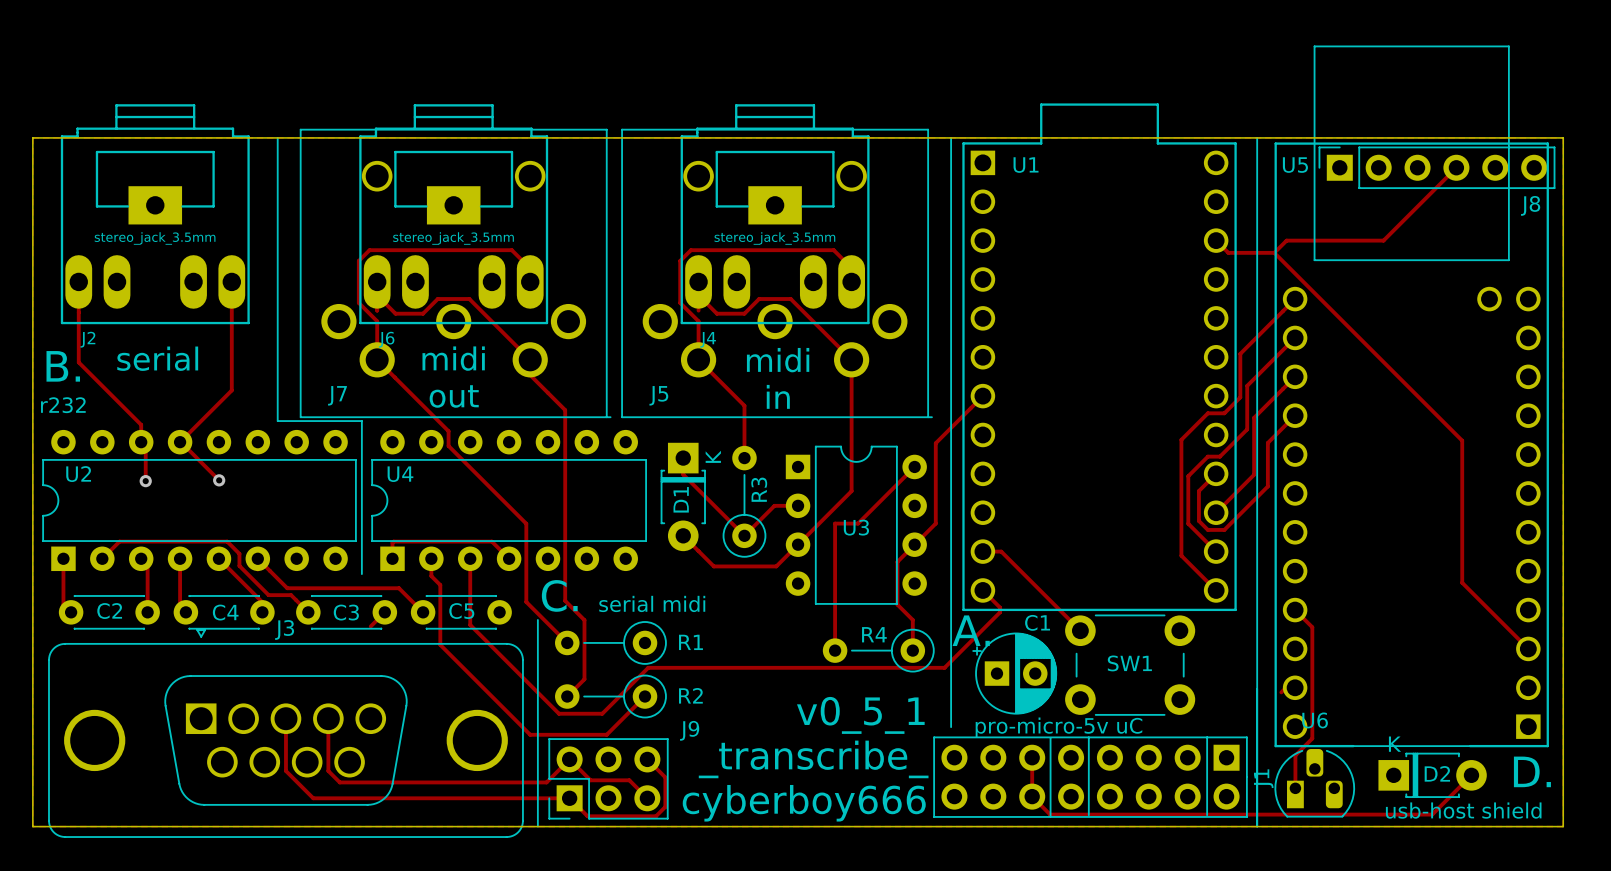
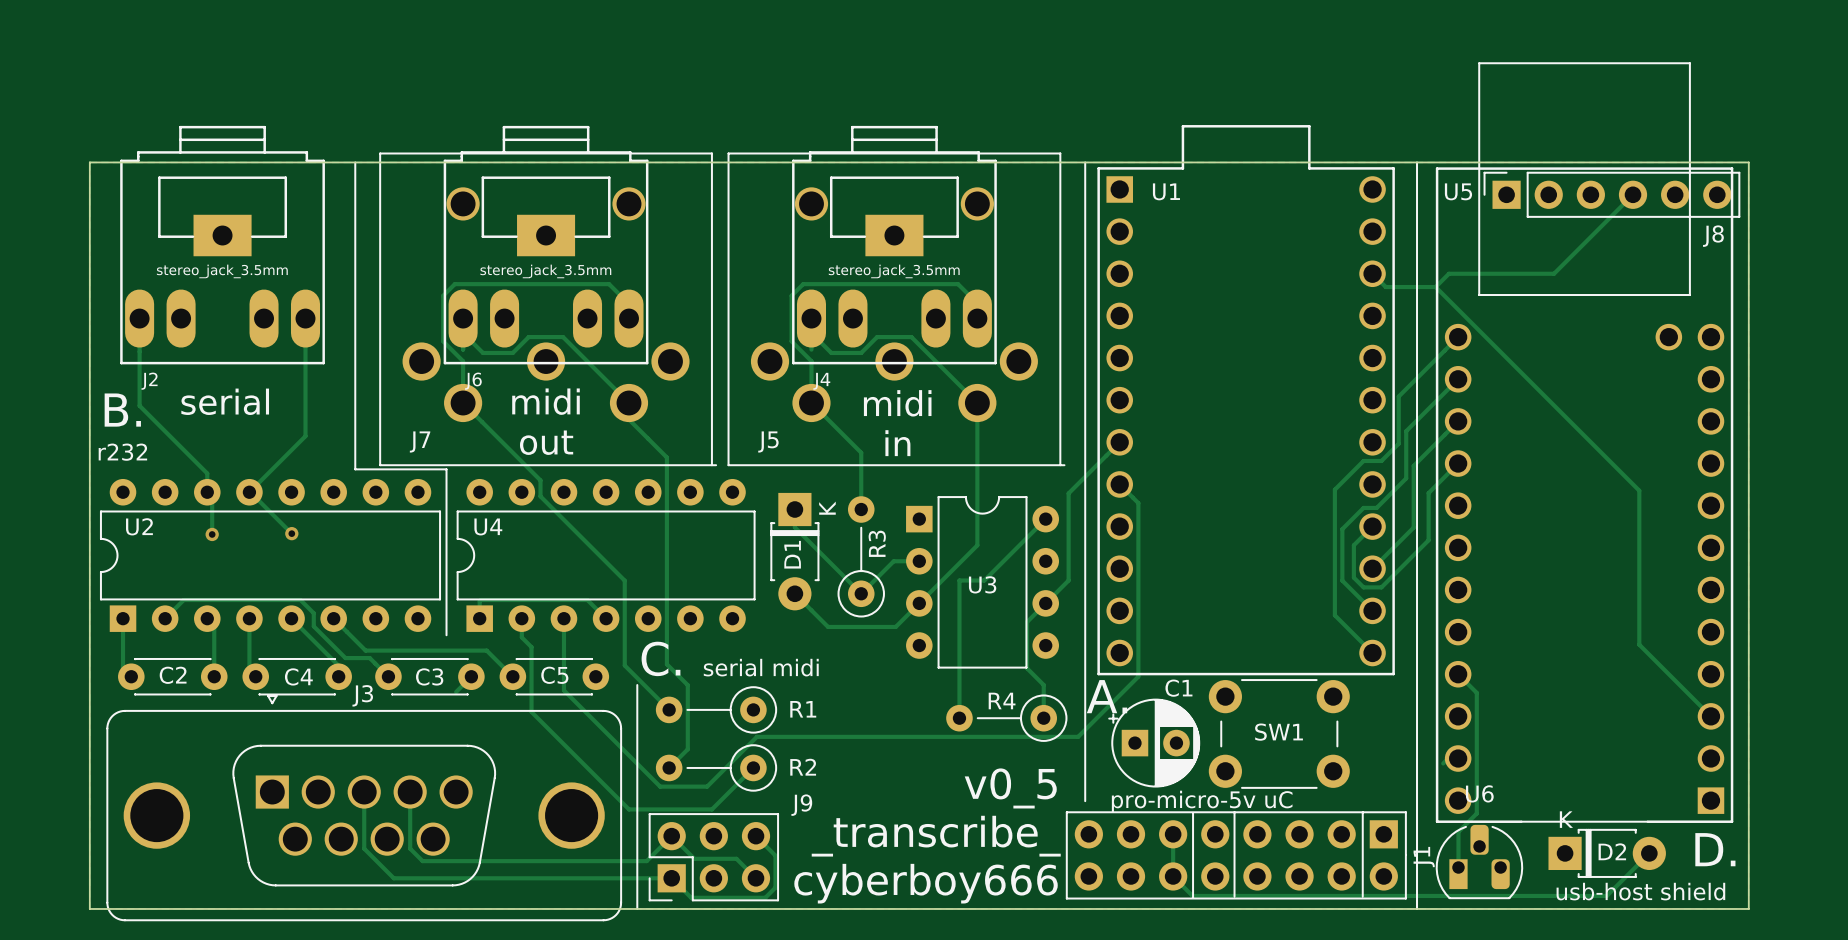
track: (982, 551) (1001, 551) (1080, 630) -> none
track: (982, 590) (1000, 607) -> (1119, 484) (1138, 503) (1138, 671)
text: v0_5_1 (860, 715) -> v0_5 (1010, 788)

